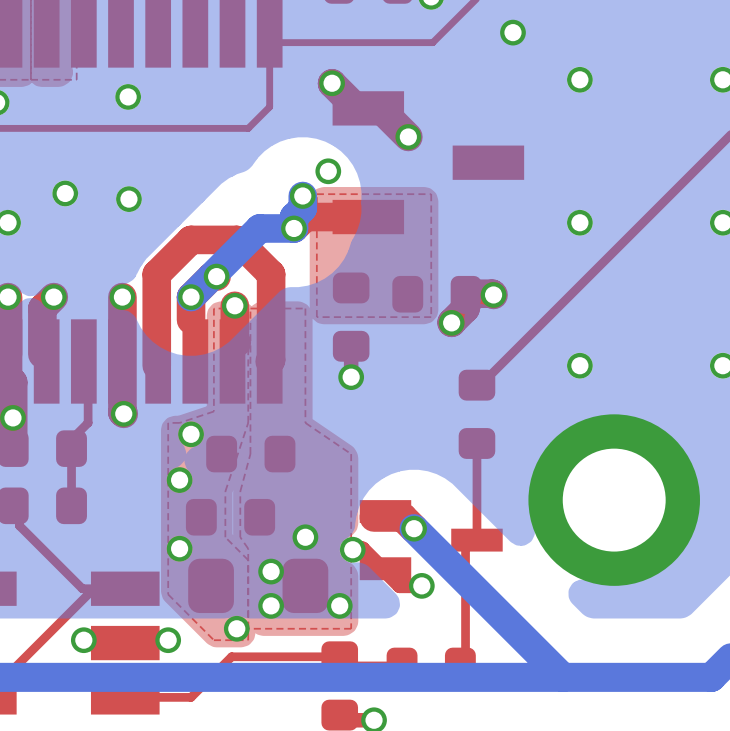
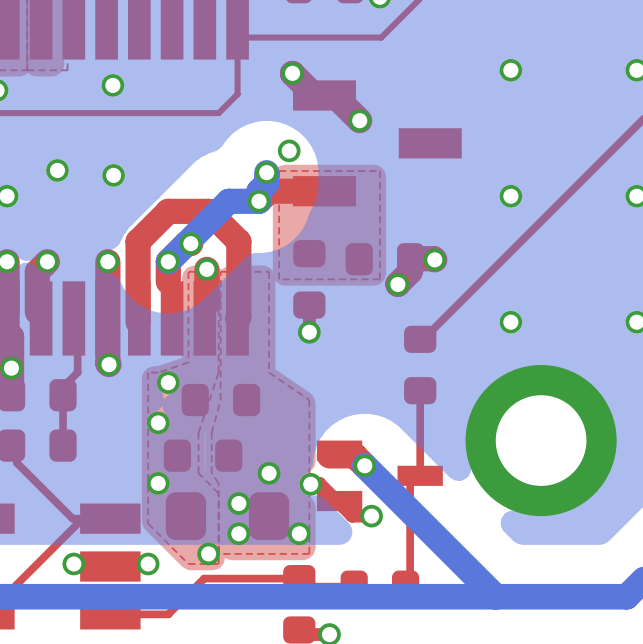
via: (512, 32) -> none

